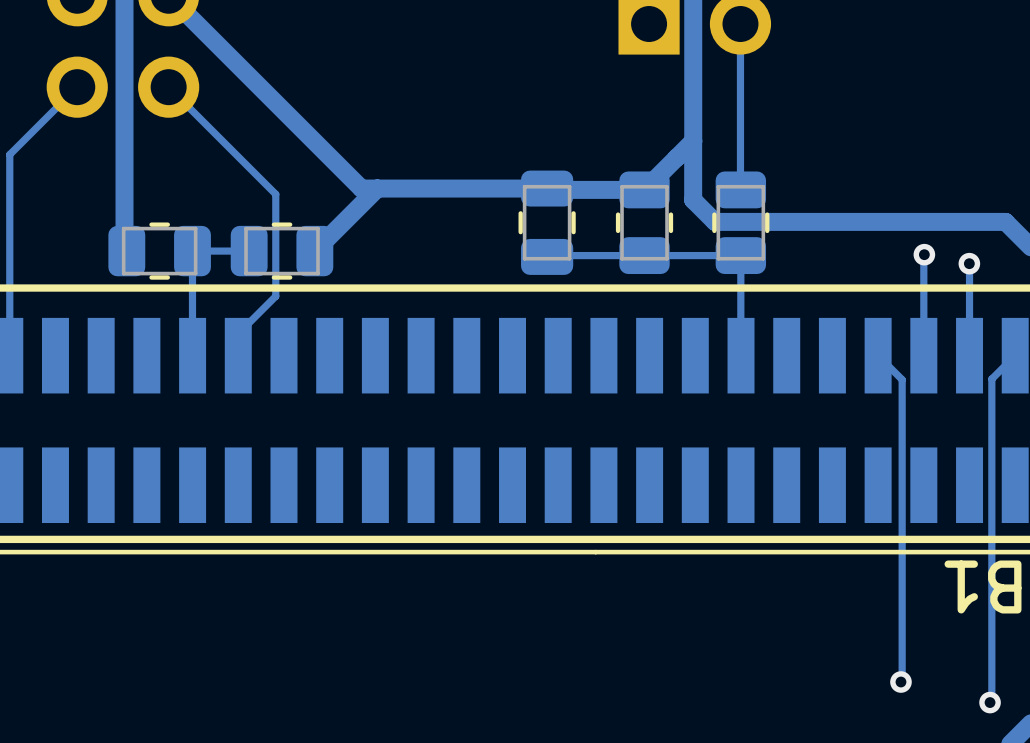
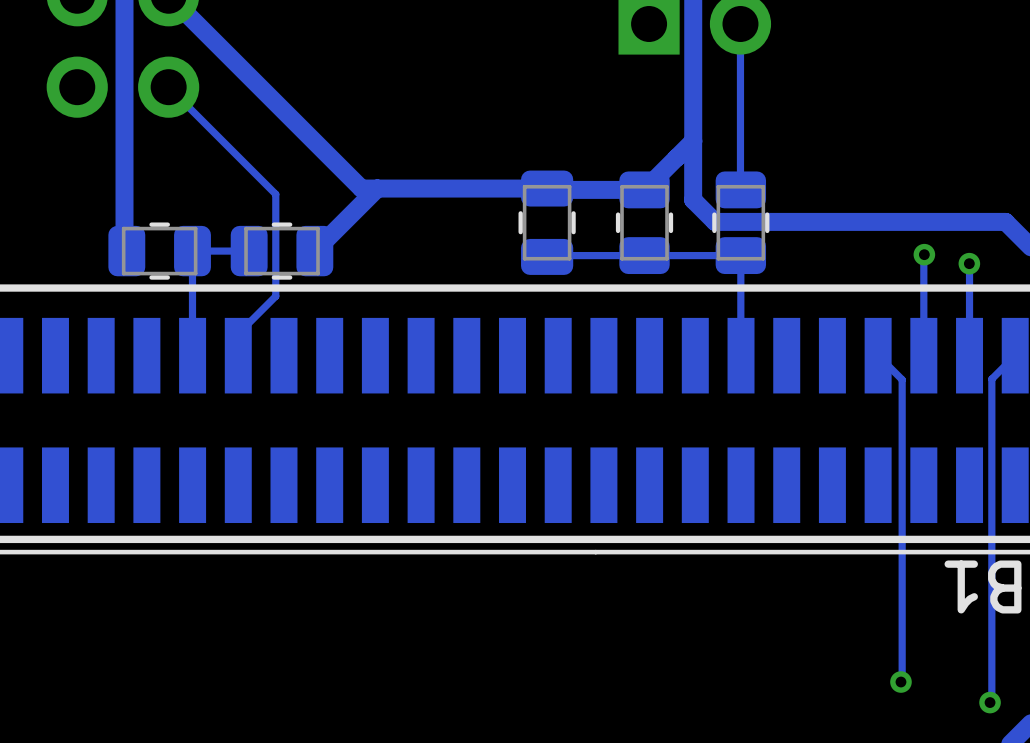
track: (77, 87) (9, 154) (9, 355) -> none

